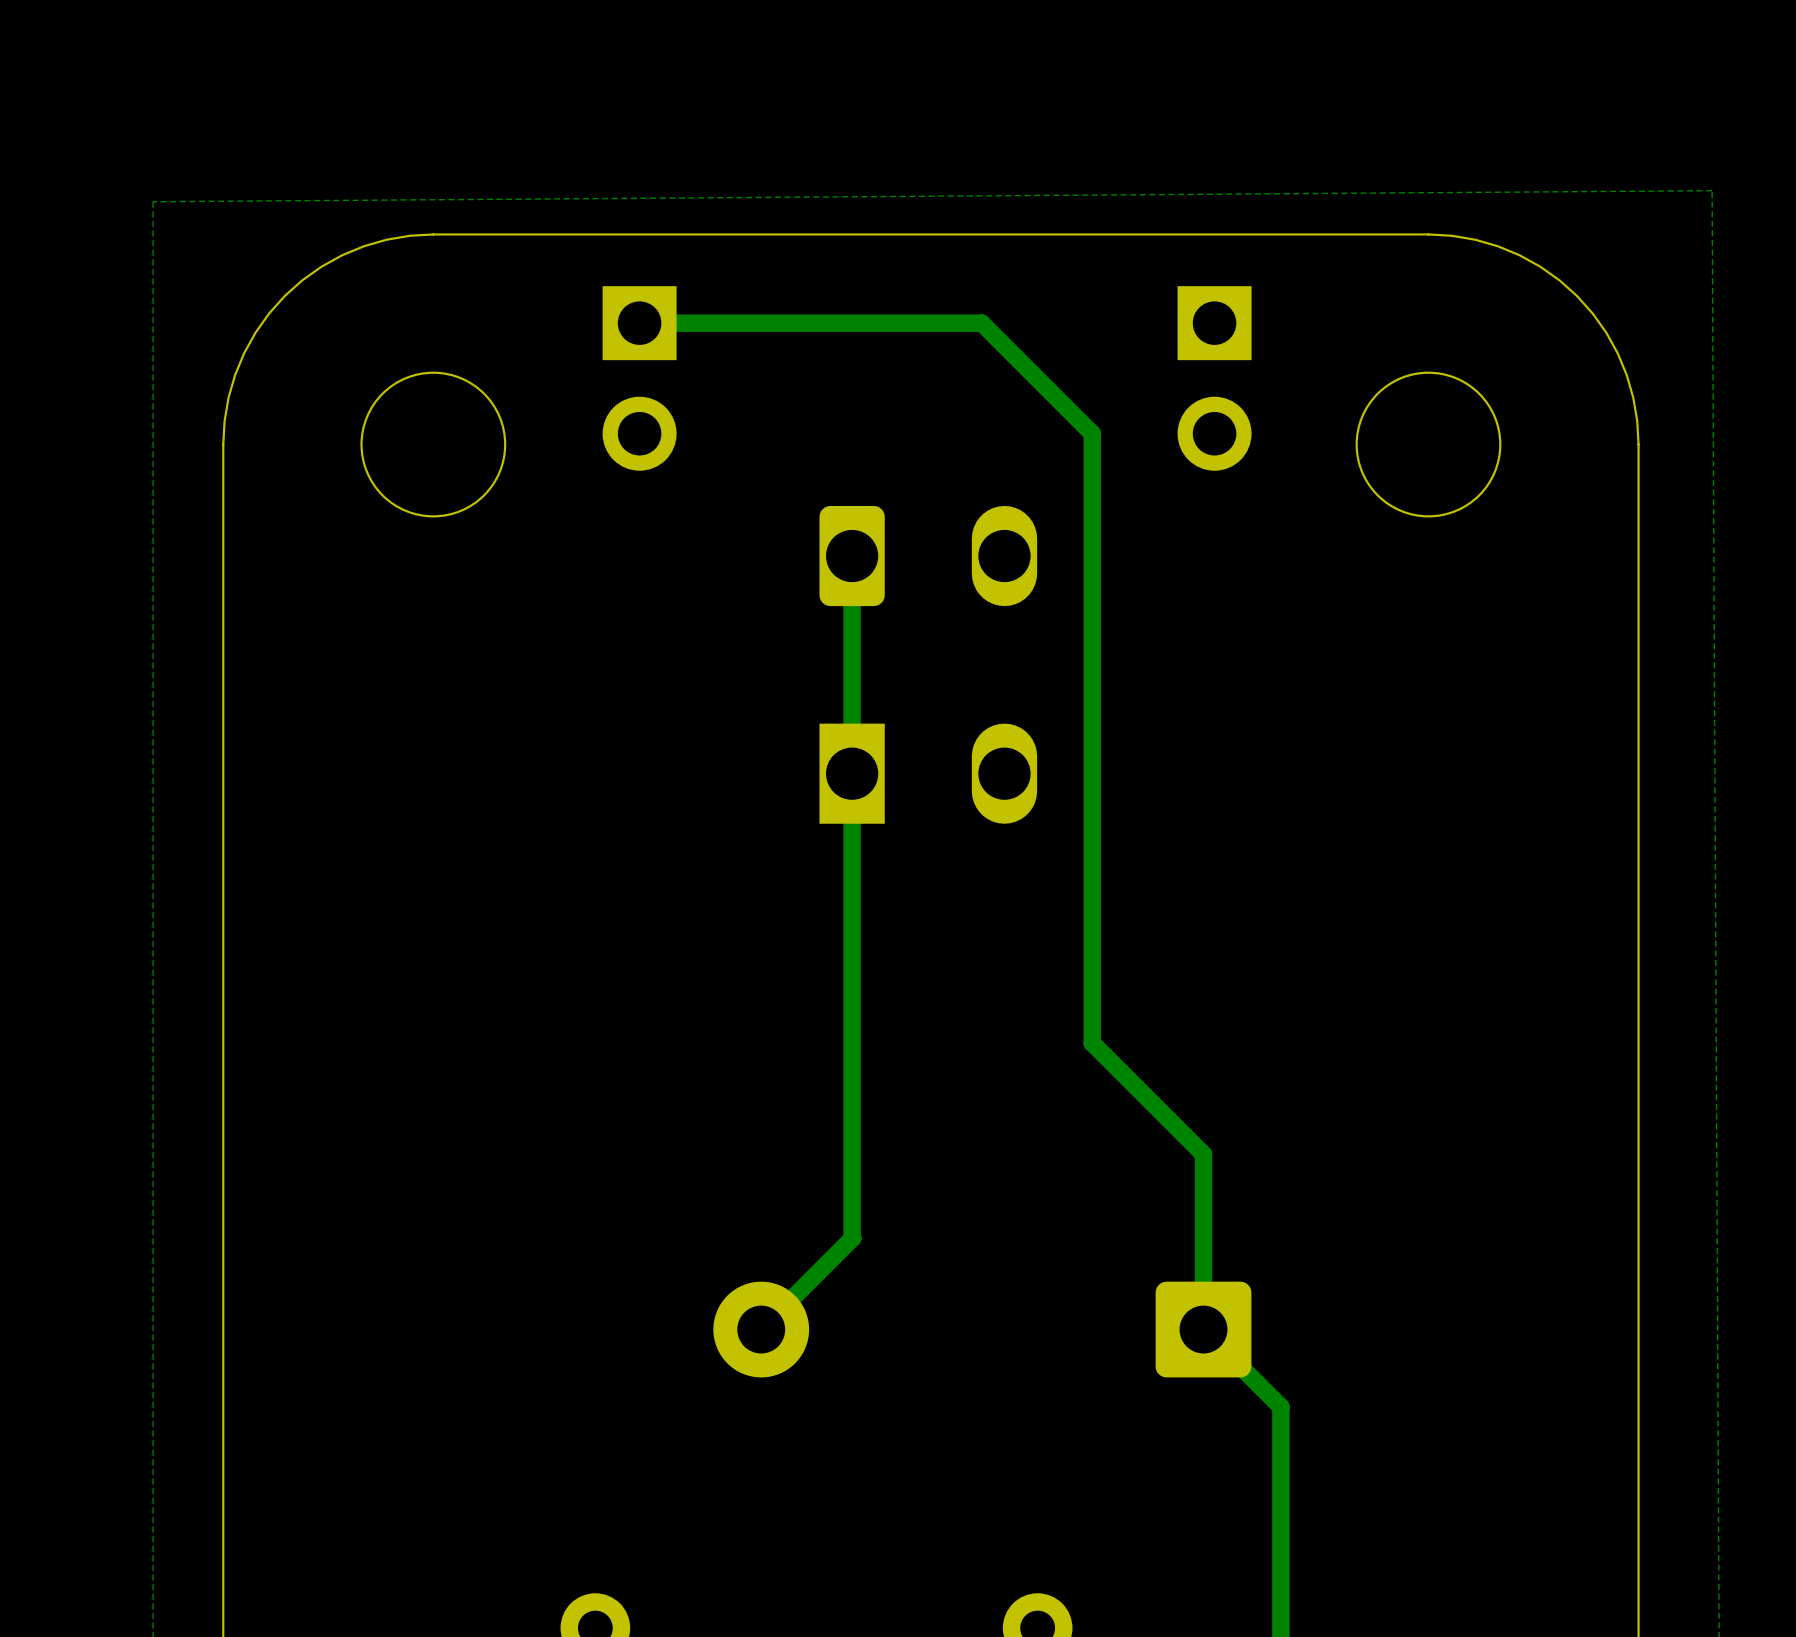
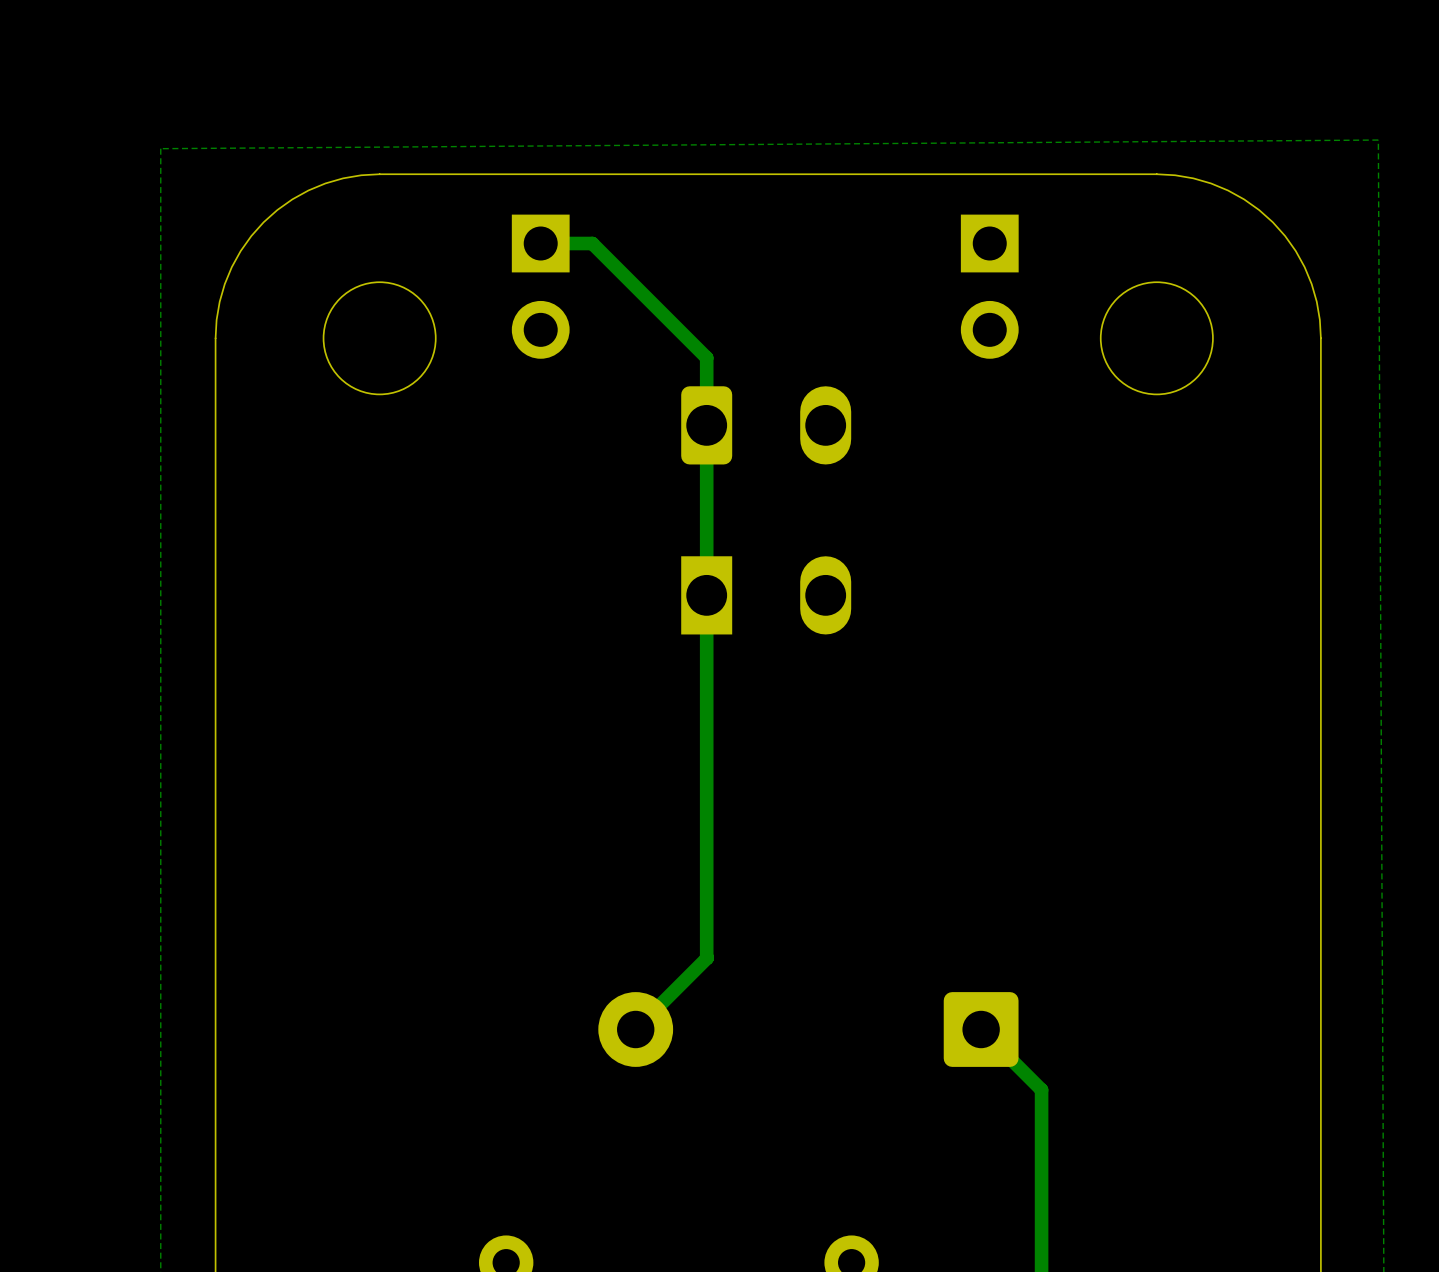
track: (705, 323) (981, 323) (1092, 433) (1092, 1043) (1203, 1154) (1203, 1329) -> (592, 243) (706, 357) (706, 425)

